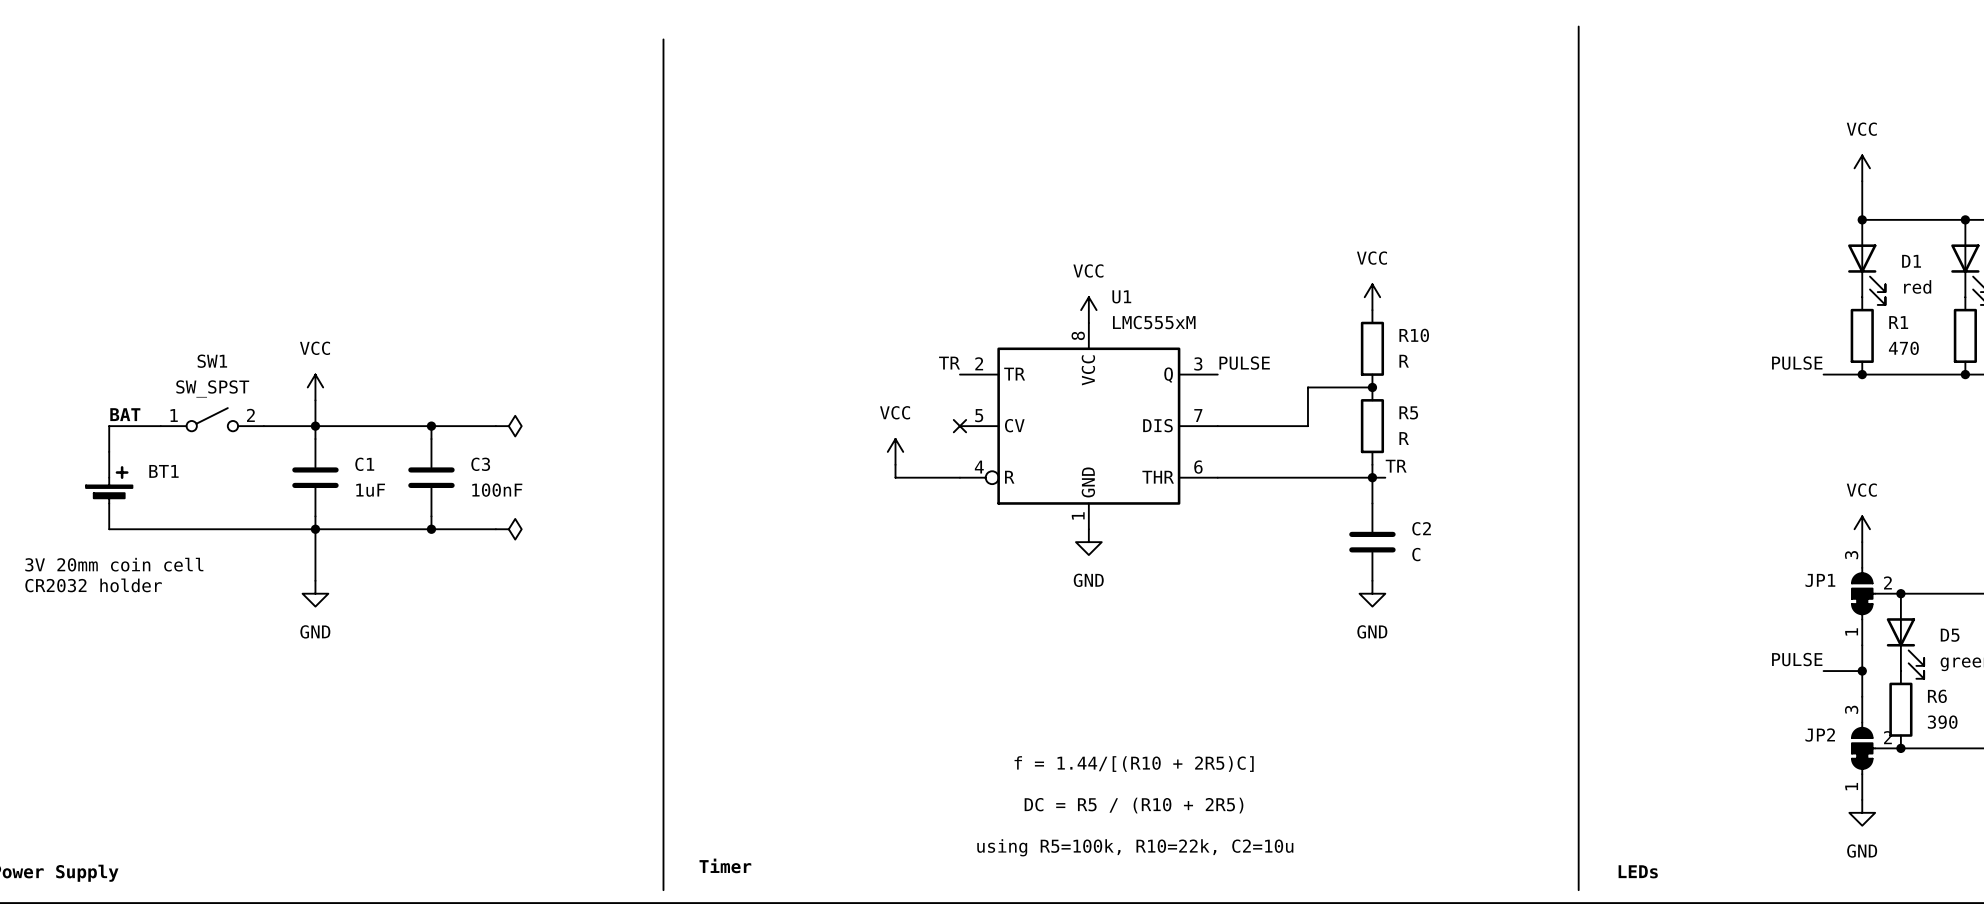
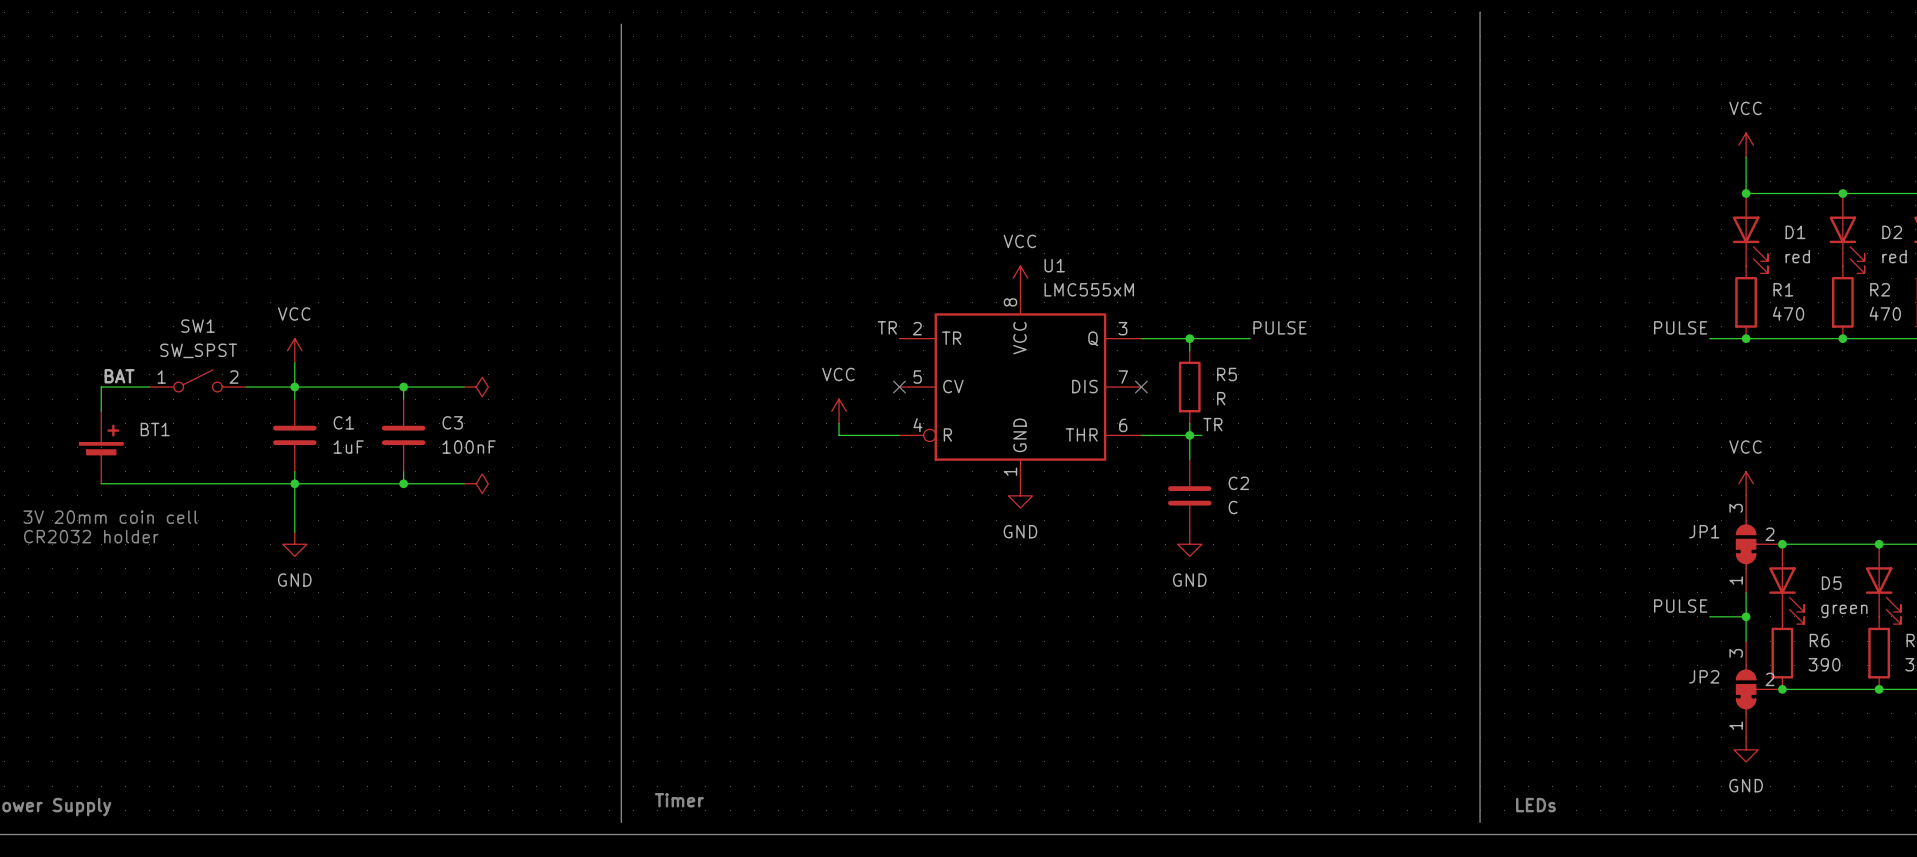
power symbol: VCC (1372, 297) -> none
R10: R (1372, 348) -> none
label position: PULSE (1244, 363) -> PULSE (1279, 327)
wire: none -> (1141, 338) (1250, 338)
wire: none -> (1189, 338) (1189, 350)
junction: none -> (1189, 338)
wire: (1372, 387) (1307, 387) (1307, 426) (1217, 426) -> none
junction: (1372, 387) -> none
no-connect mark: none -> (1141, 387)
R5 position: (1372, 426) -> (1189, 387)
wire: (1372, 464) (1372, 503) -> (1189, 423) (1189, 459)
label position: TR (1396, 466) -> TR (1212, 424)
junction: none -> (1189, 435)
wire: (1282, 477) (1385, 477) -> none
junction: (1372, 477) -> none
C2 position: (1372, 542) -> (1189, 495)
power symbol position: GND (1372, 593) -> GND (1189, 544)
text: f = 1.44/[(R10 + 2R5)C] (1134, 764) -> none
text: DC = R5 / (R10 + 2R5) (1134, 805) -> none
text: using R5=100k, R10=22k, C2=10u (1135, 847) -> none

